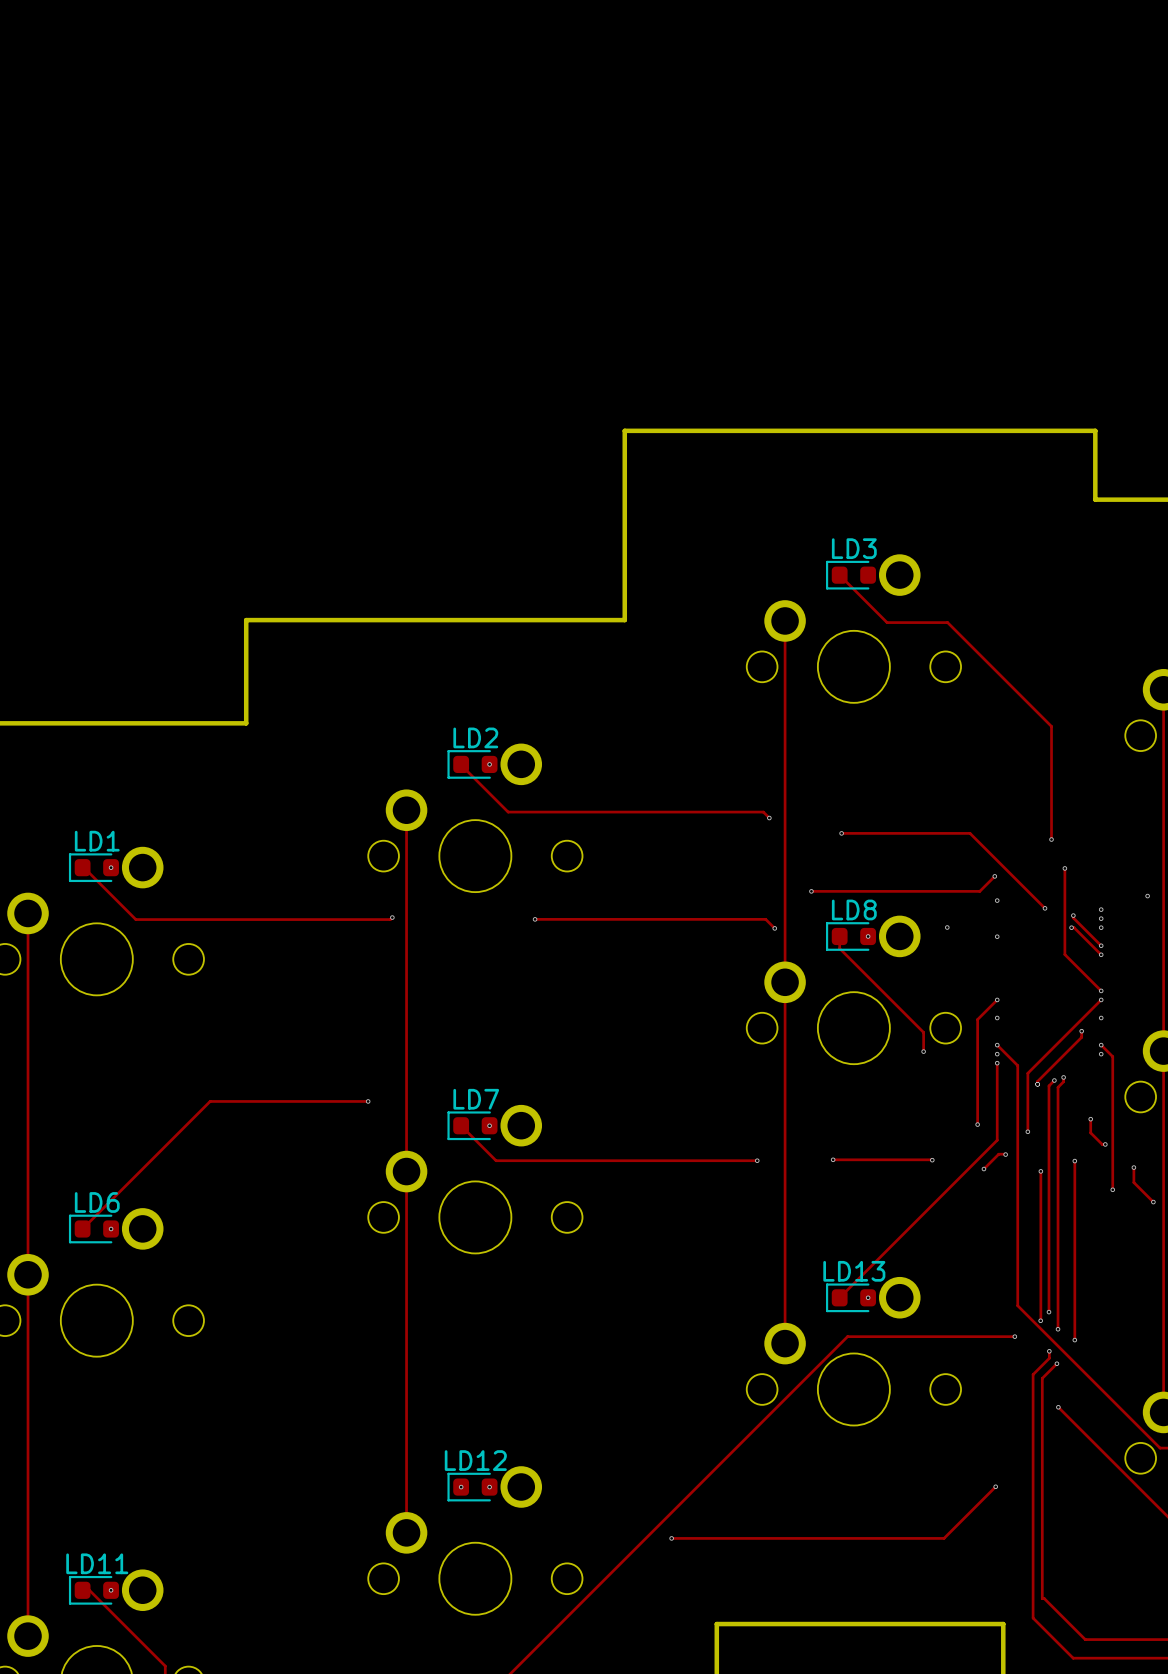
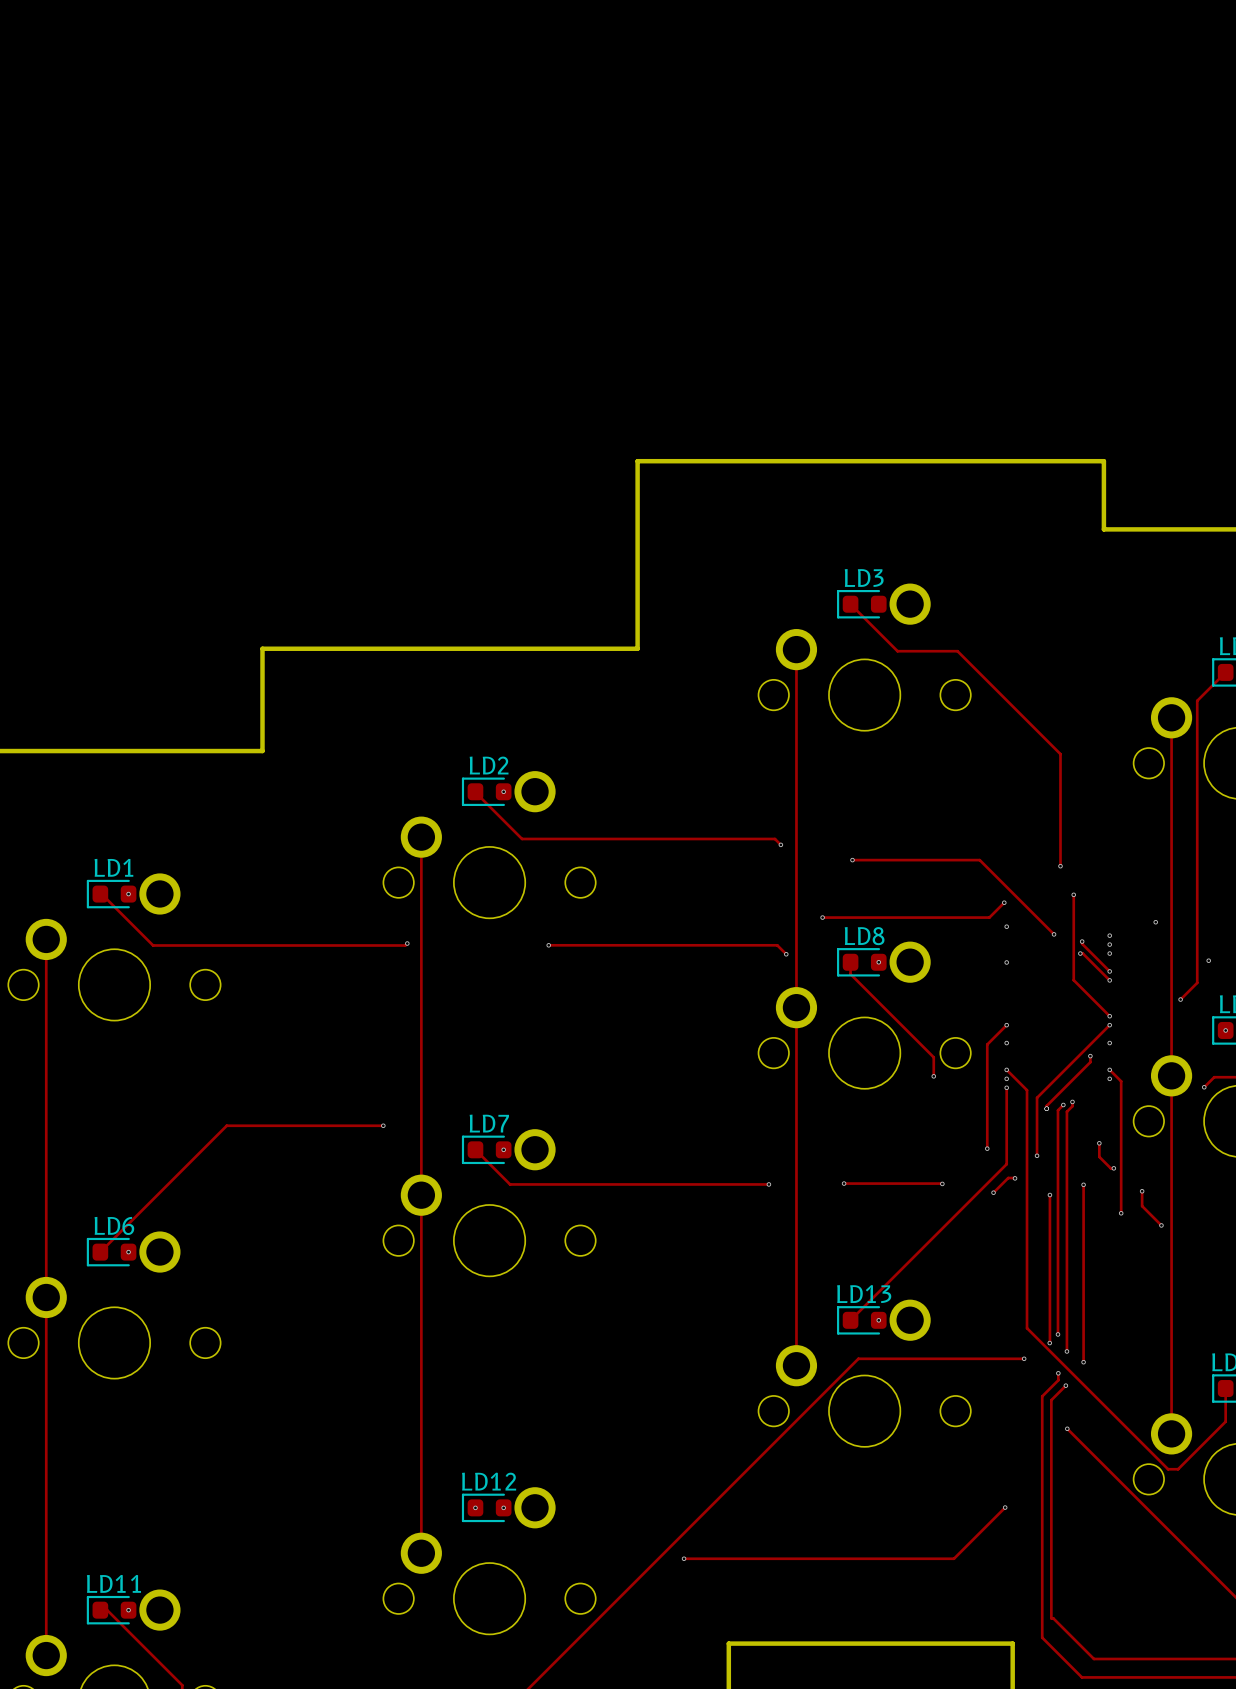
via: (947, 927) -> none

